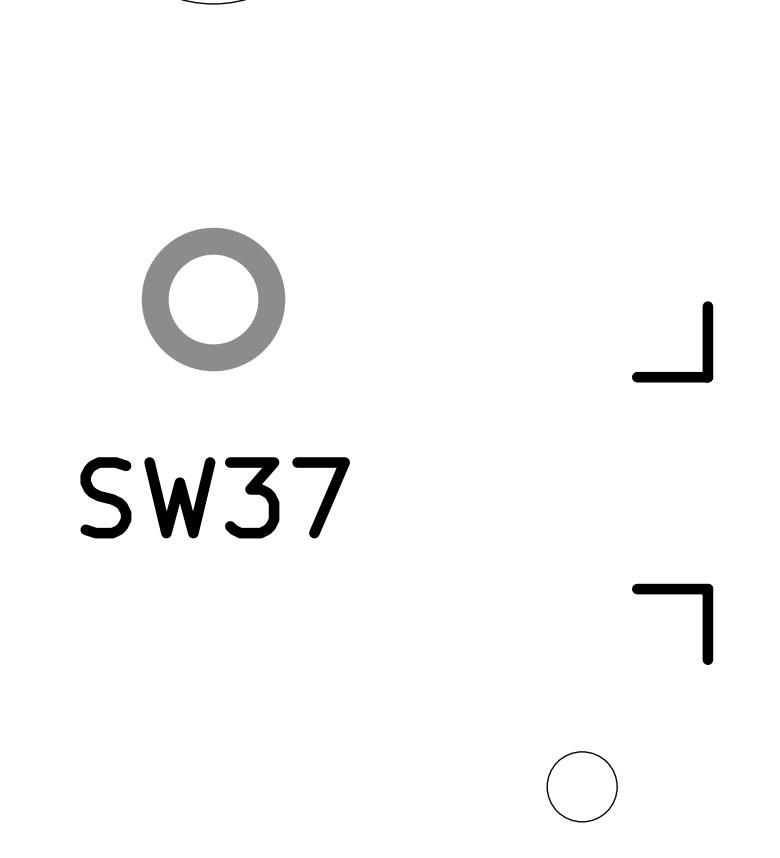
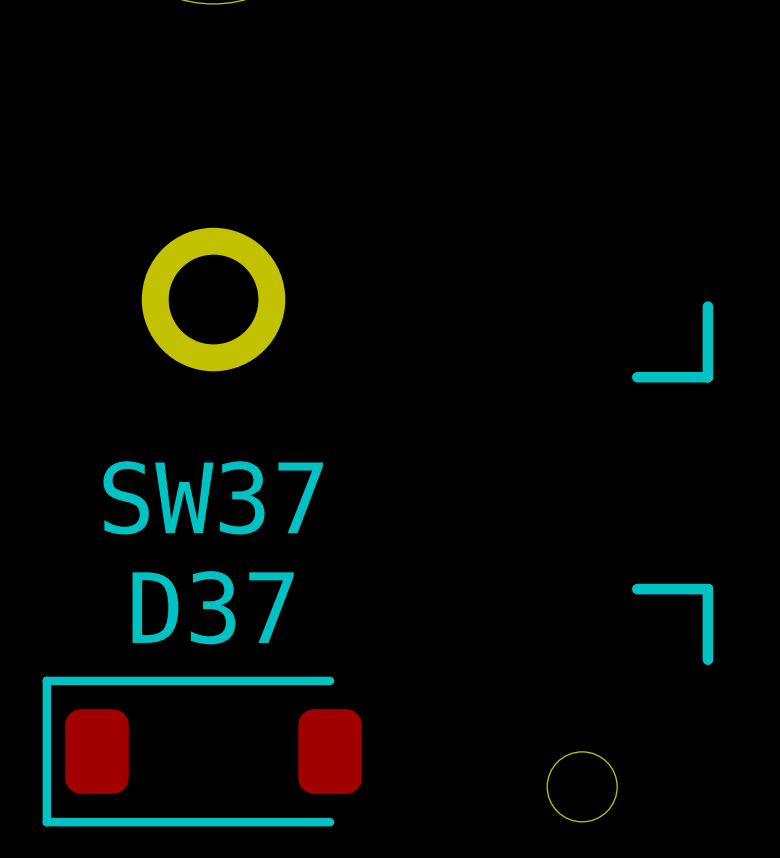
D37: none -> (202, 751)

